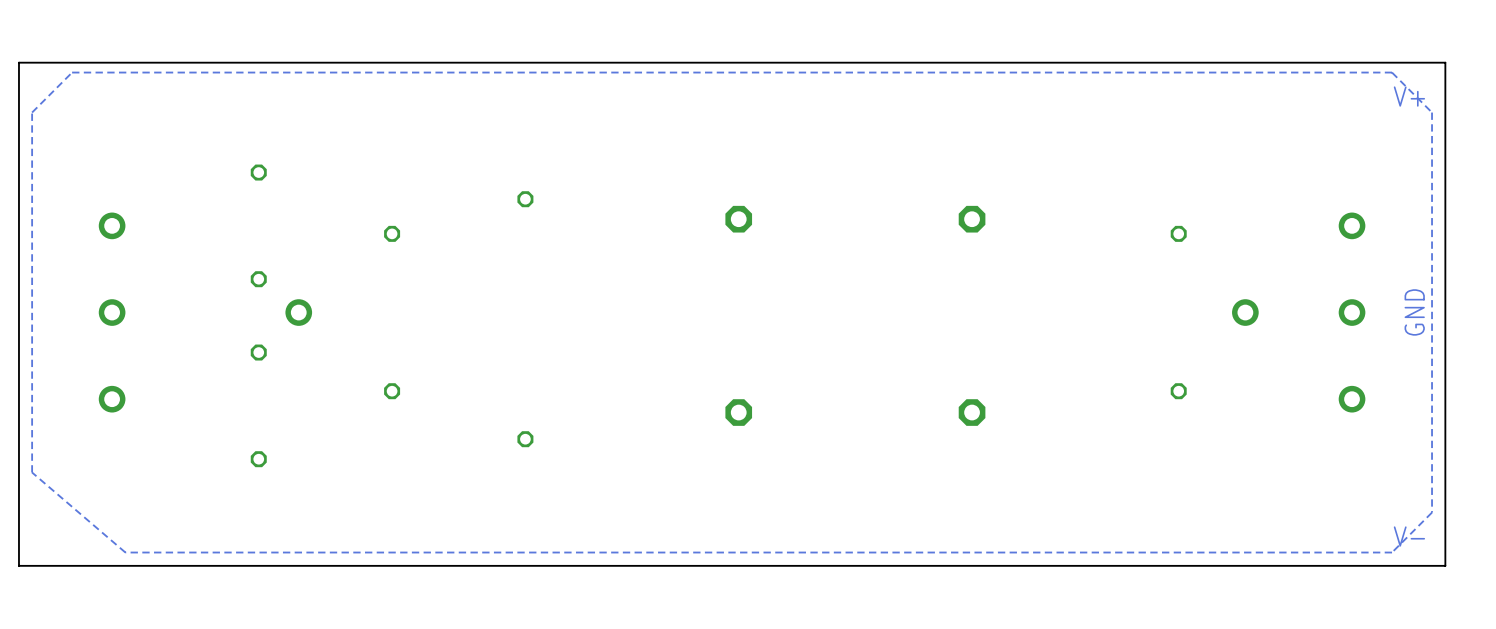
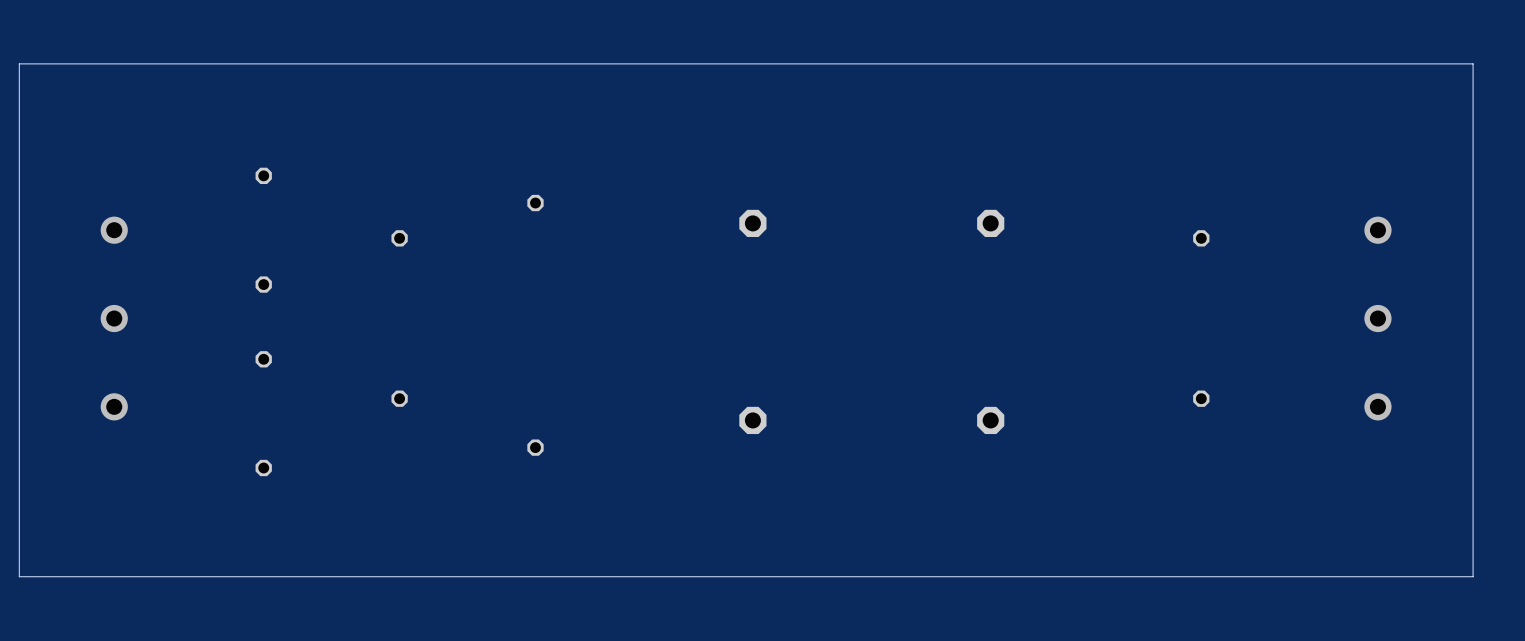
zone outline: (1392, 72) (1432, 112) (1432, 512) (1392, 552) (125, 552) (32, 472) (32, 112) (72, 72) (1392, 72) -> none
text: V+ (1409, 96) -> none
via: (298, 312) -> none
via: (1245, 312) -> none
text: GND (1414, 312) -> none
text: V- (1409, 536) -> none

